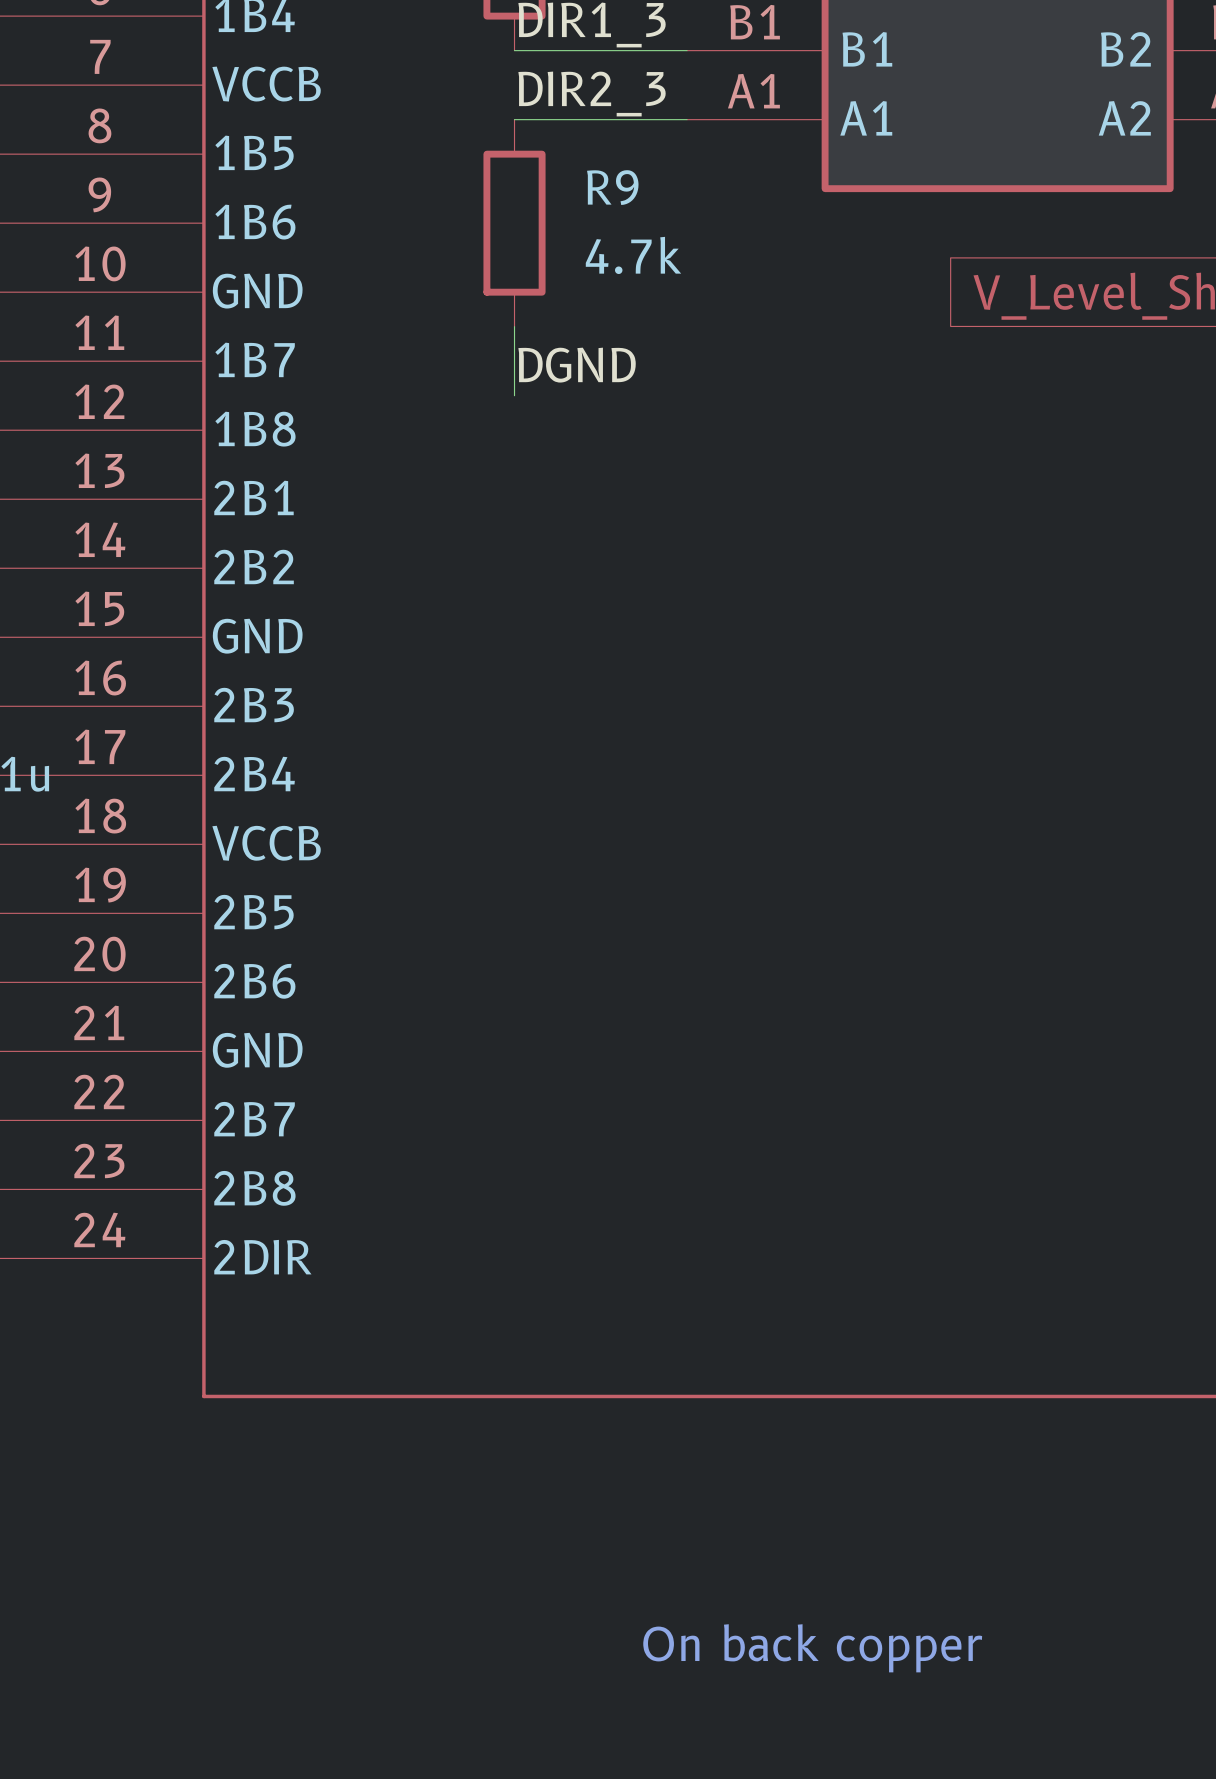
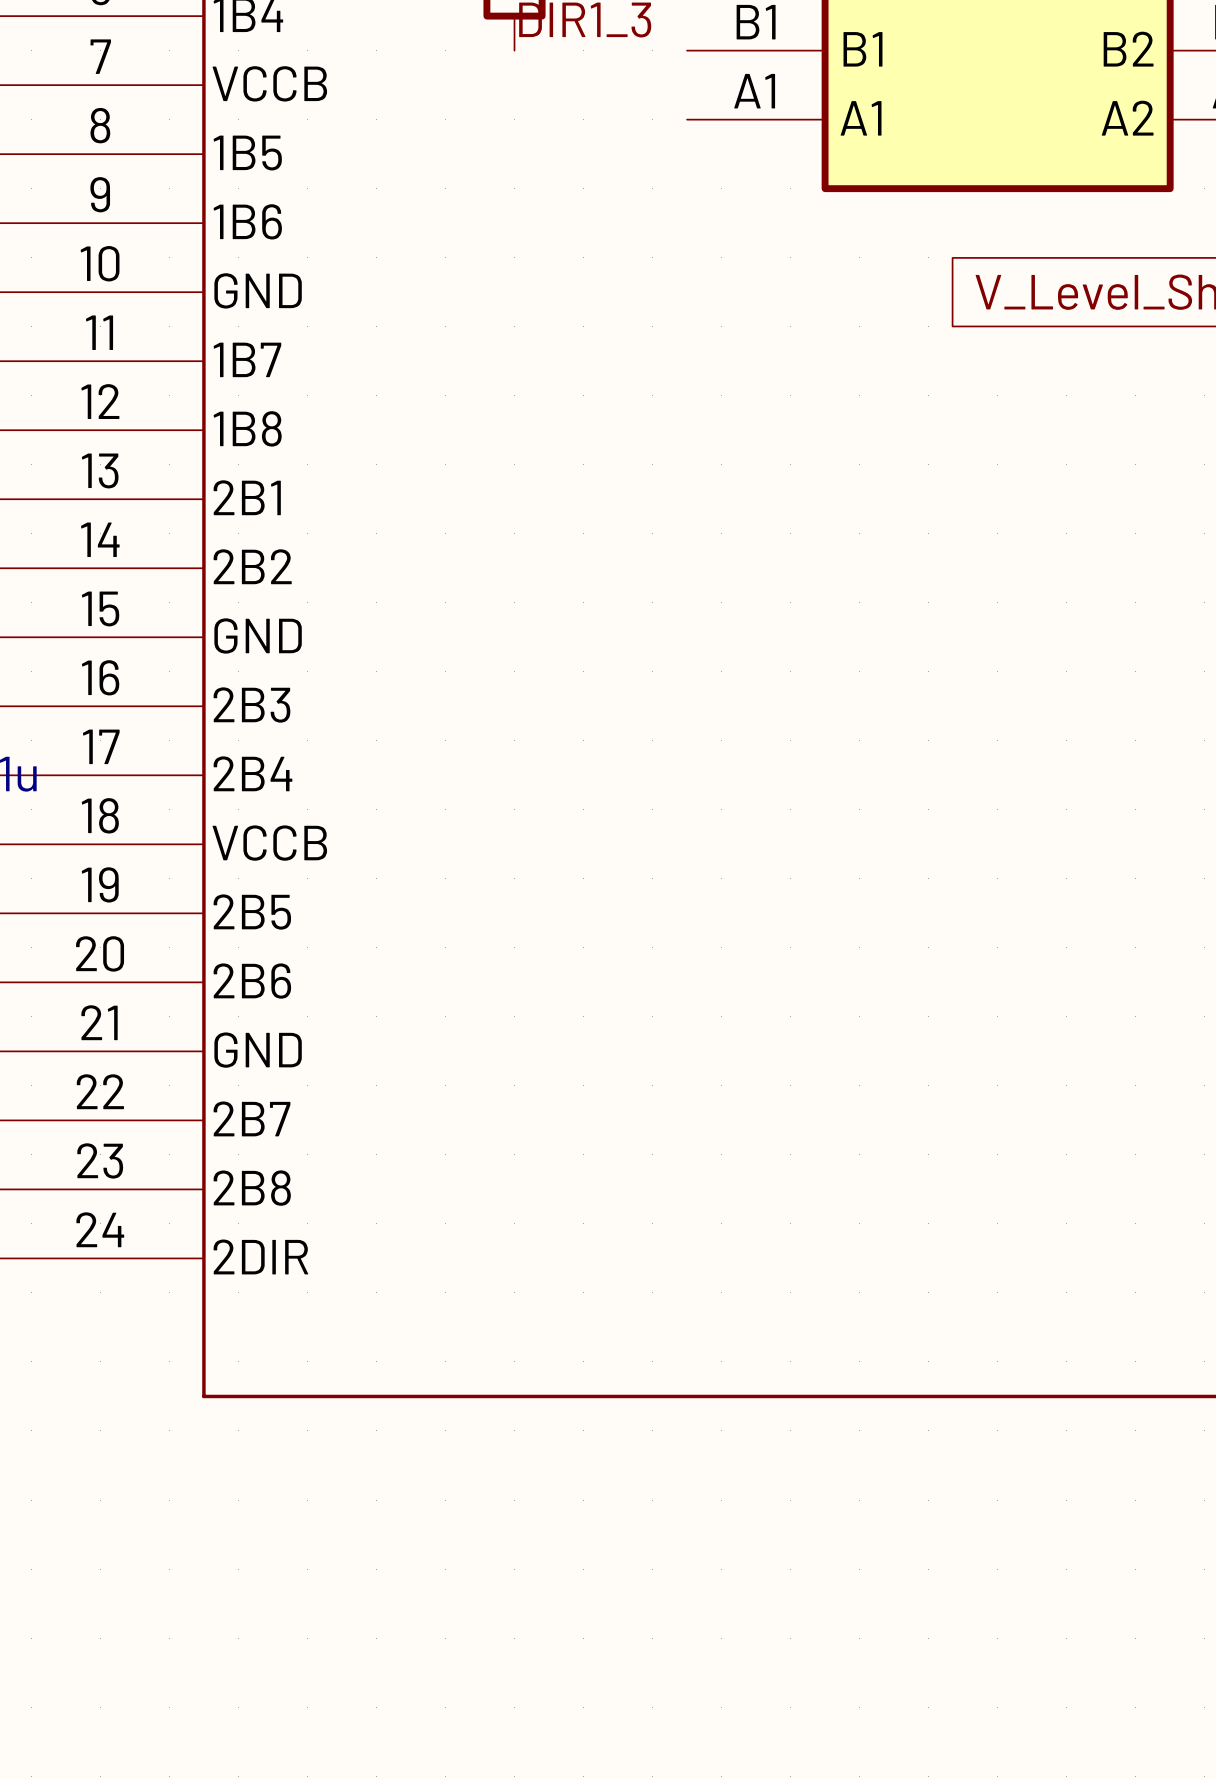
wire: (514, 50) (687, 50) -> none
label: DIR2_3 (592, 94) -> none
wire: (514, 119) (687, 119) -> none
R9: 4.7k (514, 223) -> none
wire: (514, 326) (514, 395) -> none
label: DGND (577, 365) -> none
text: On back copper (812, 1648) -> none

